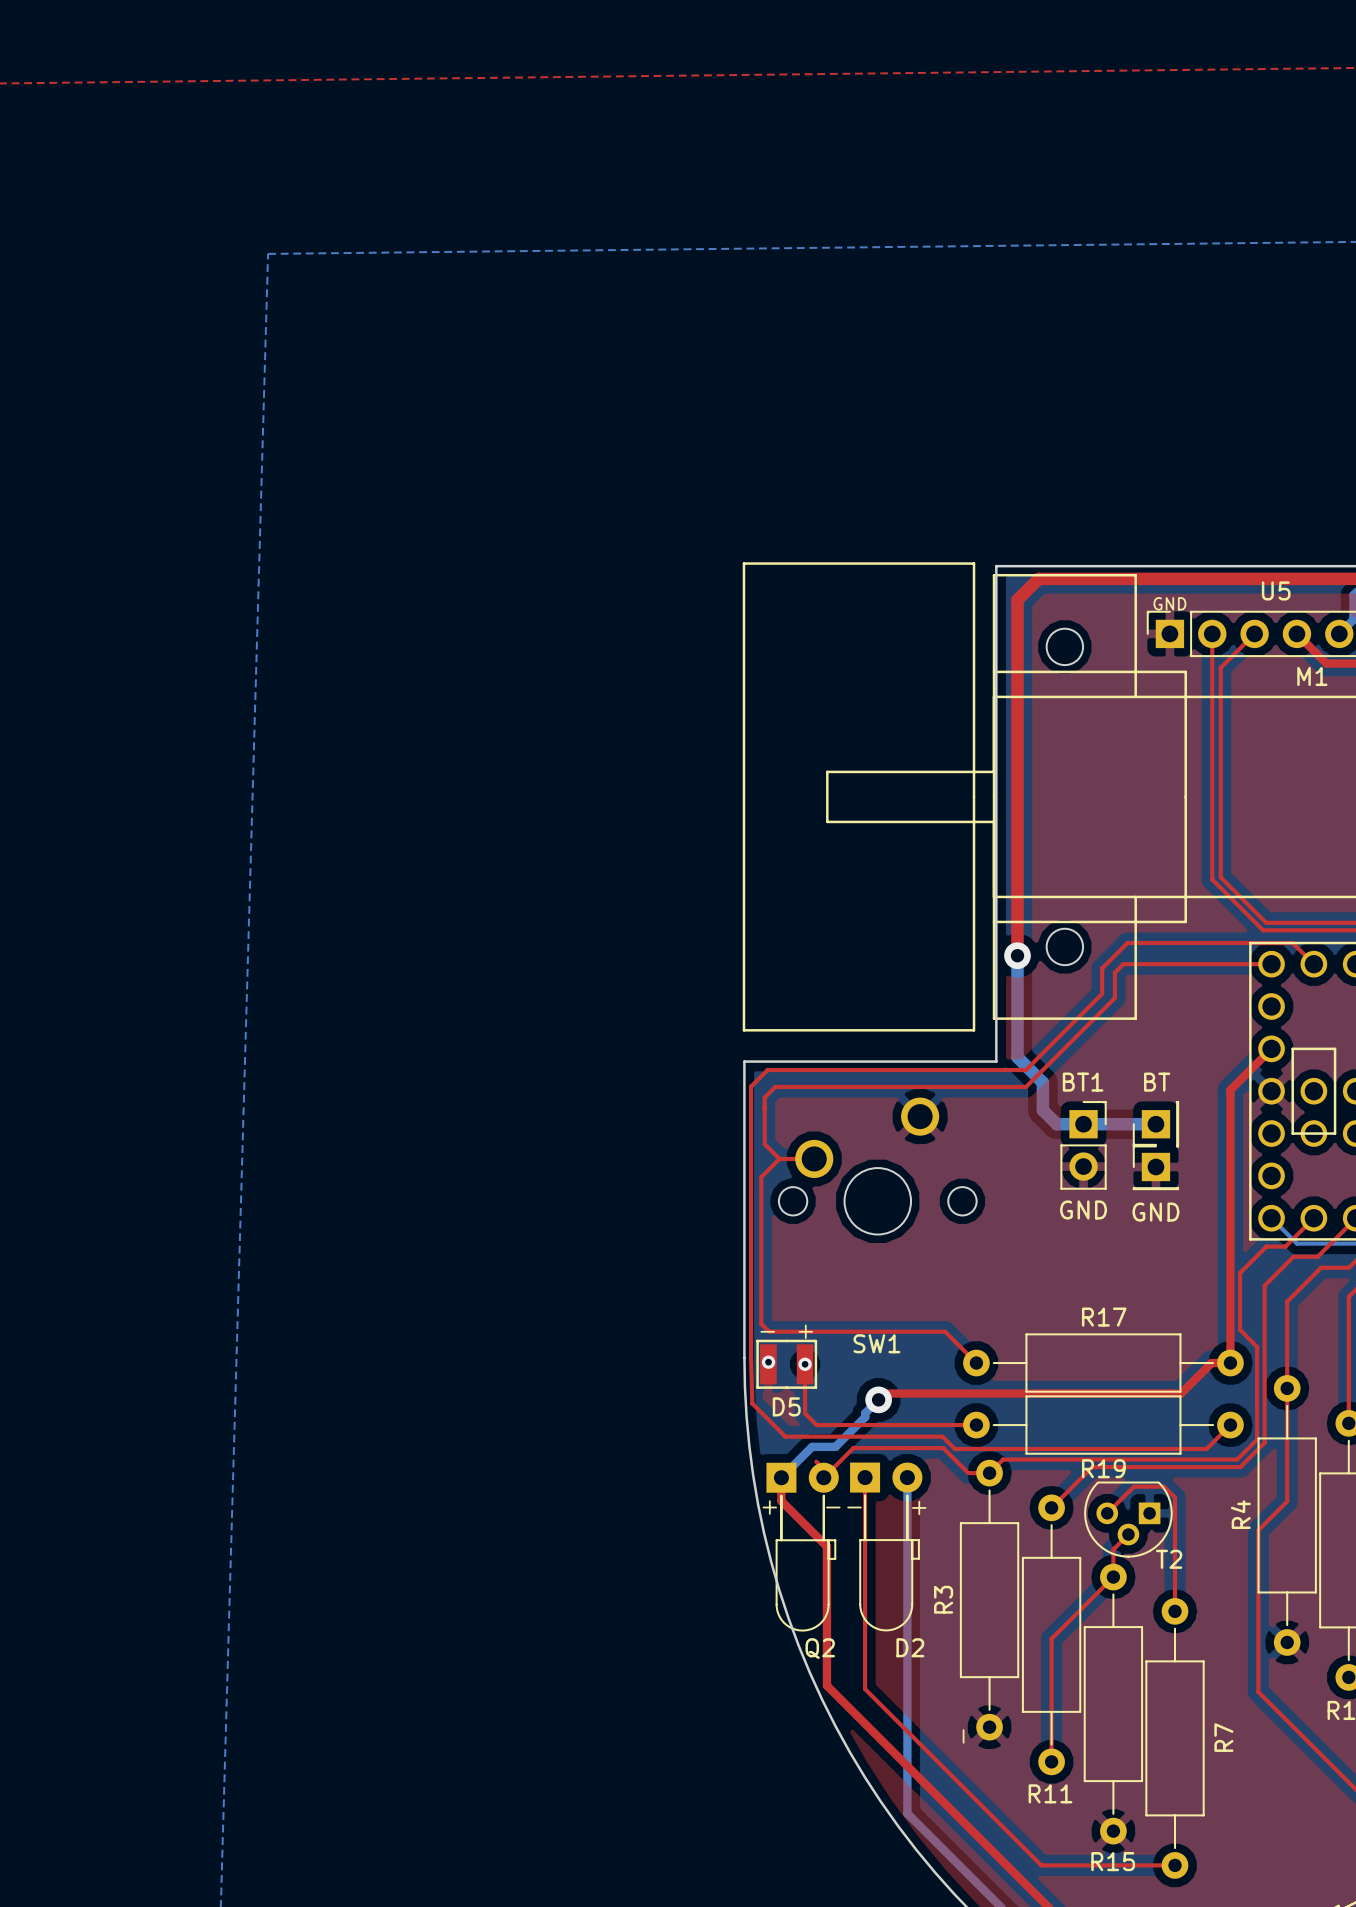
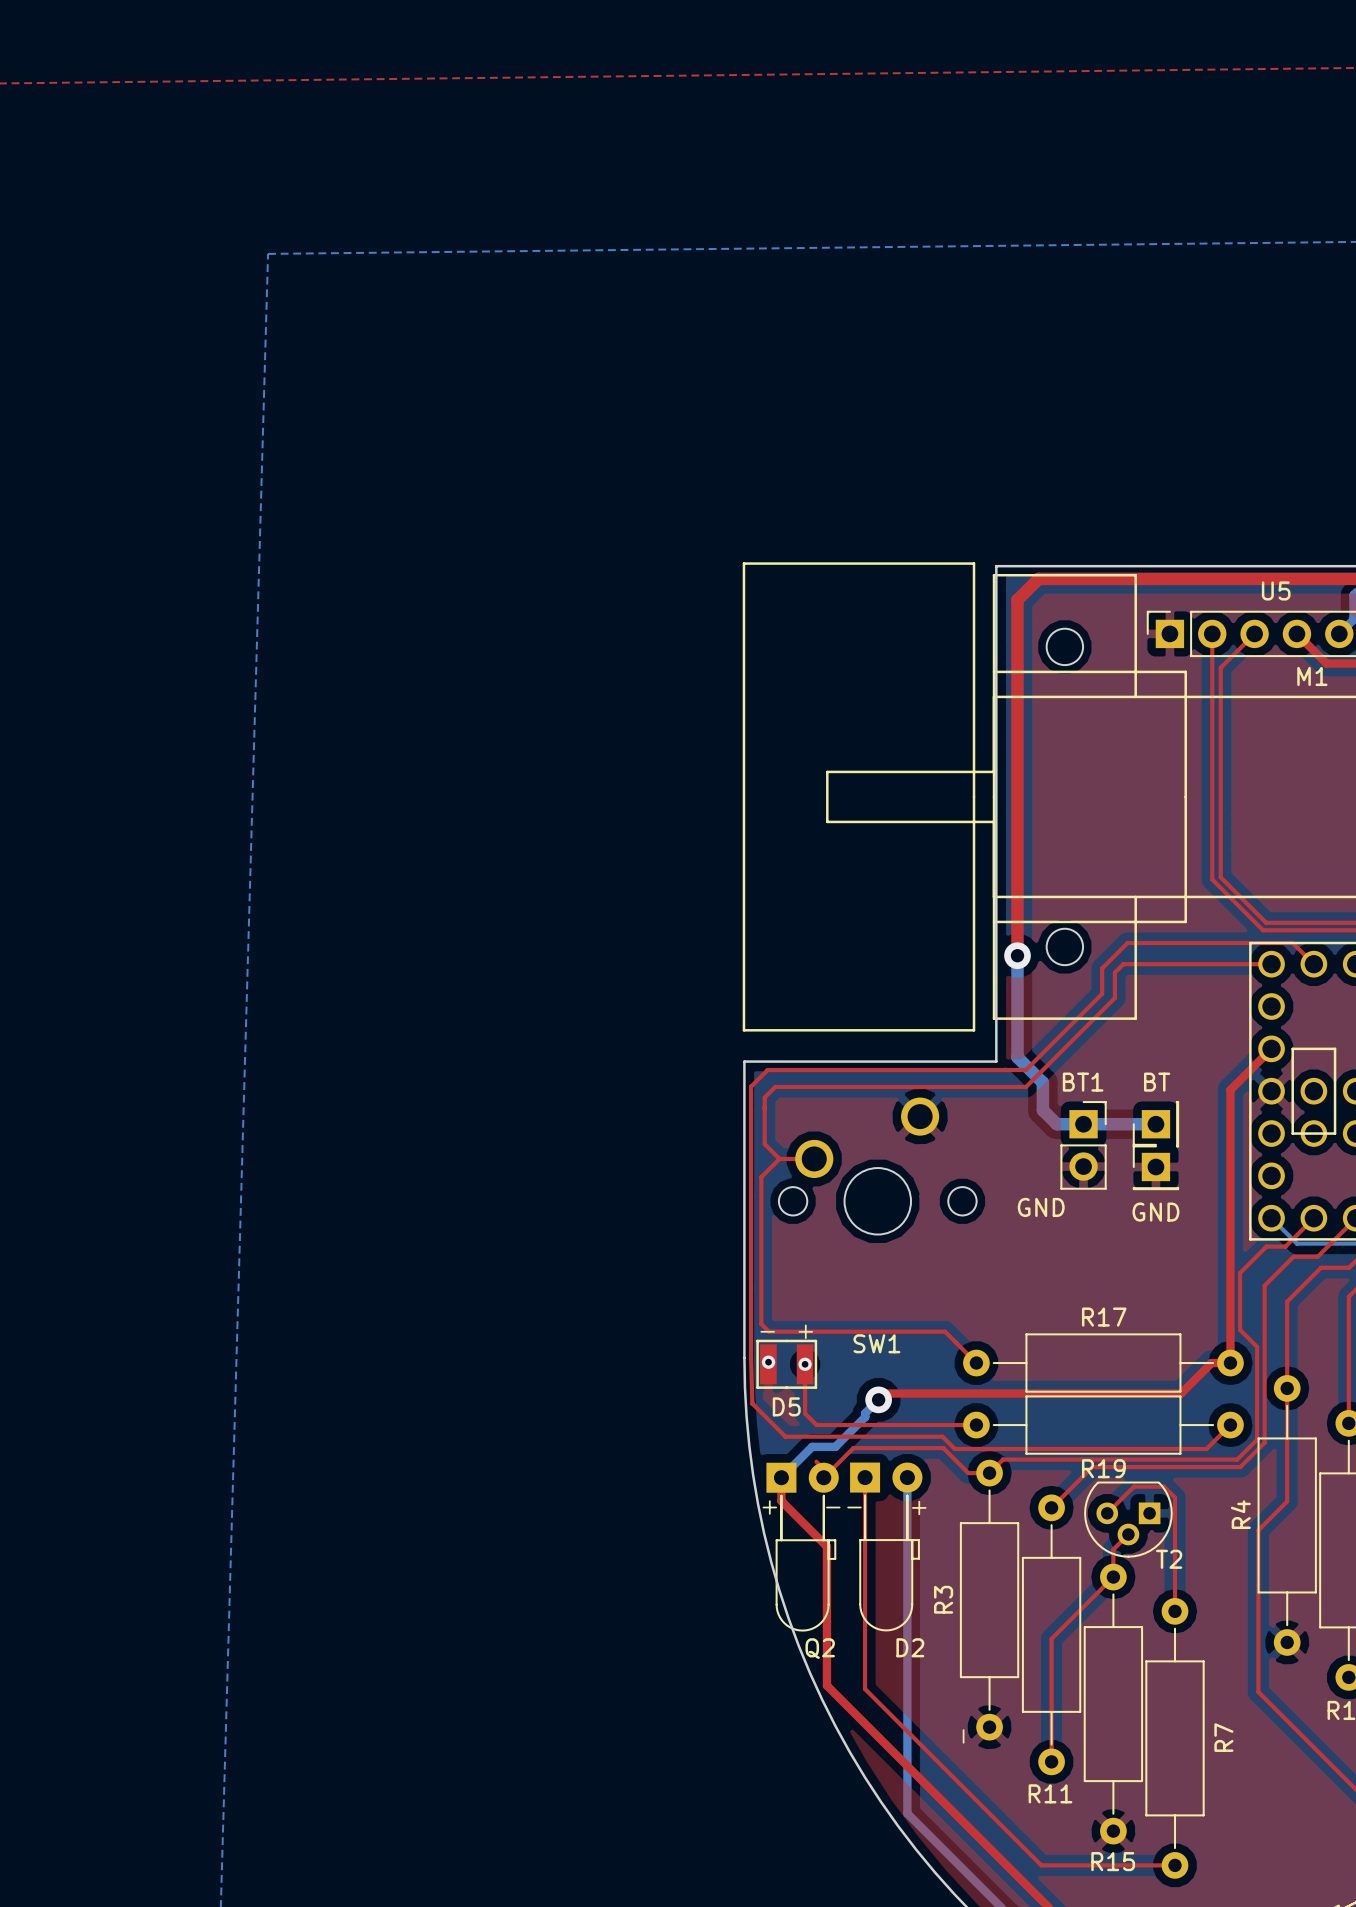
text: GND (1169, 603) -> none
text position: GND (1083, 1209) -> GND (1041, 1207)

